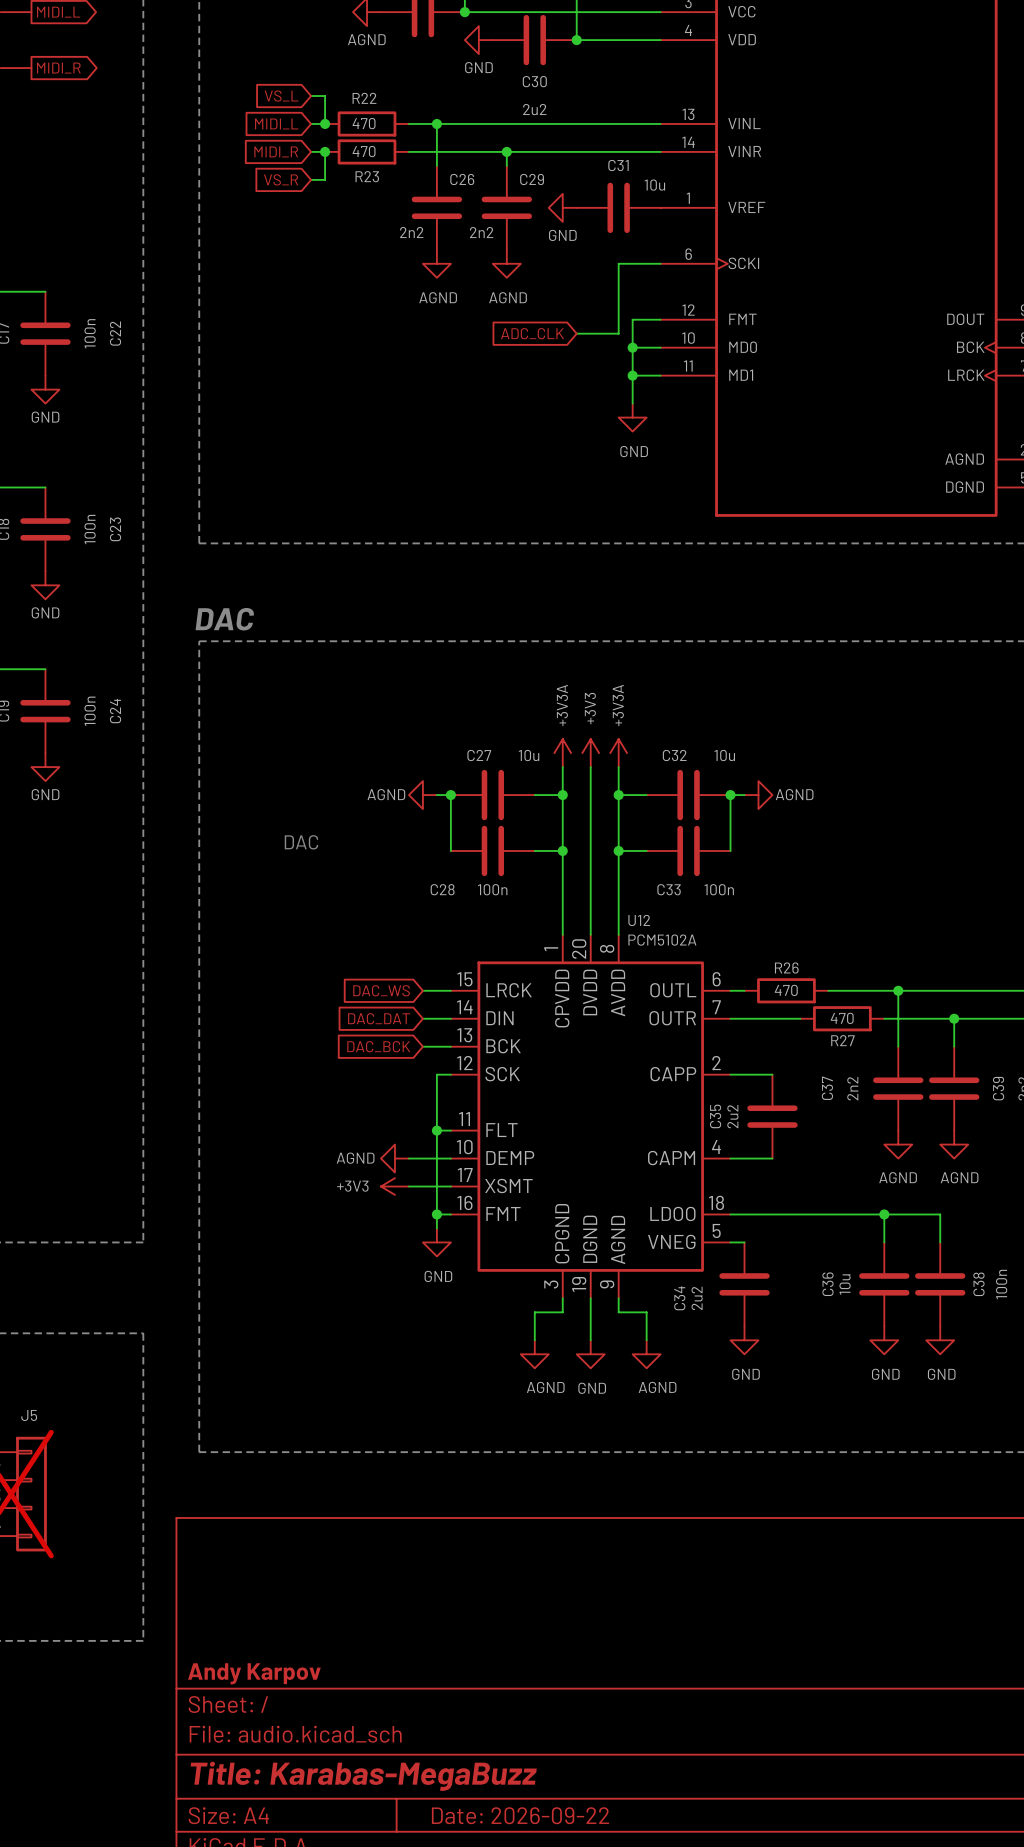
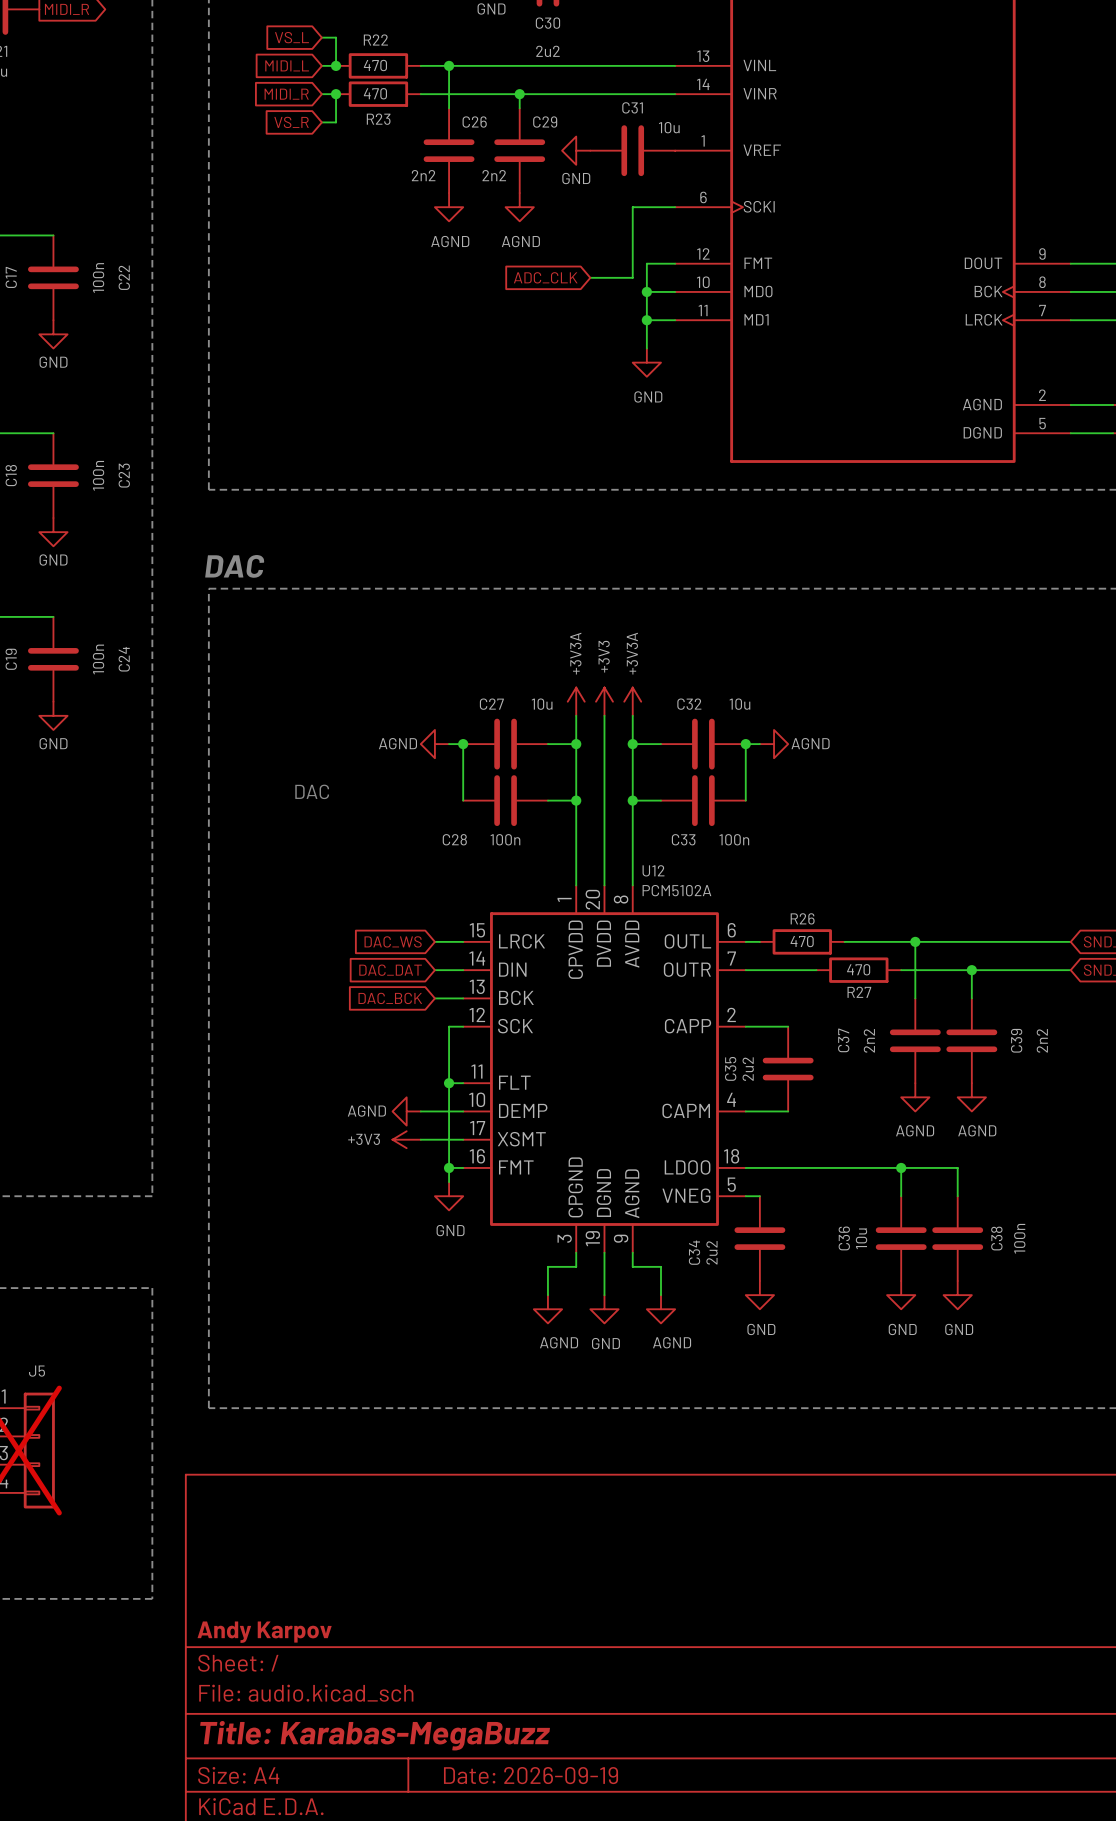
title block: Date: 2026-09-22 (520, 1815) -> Date: 2026-09-19 (531, 1775)

